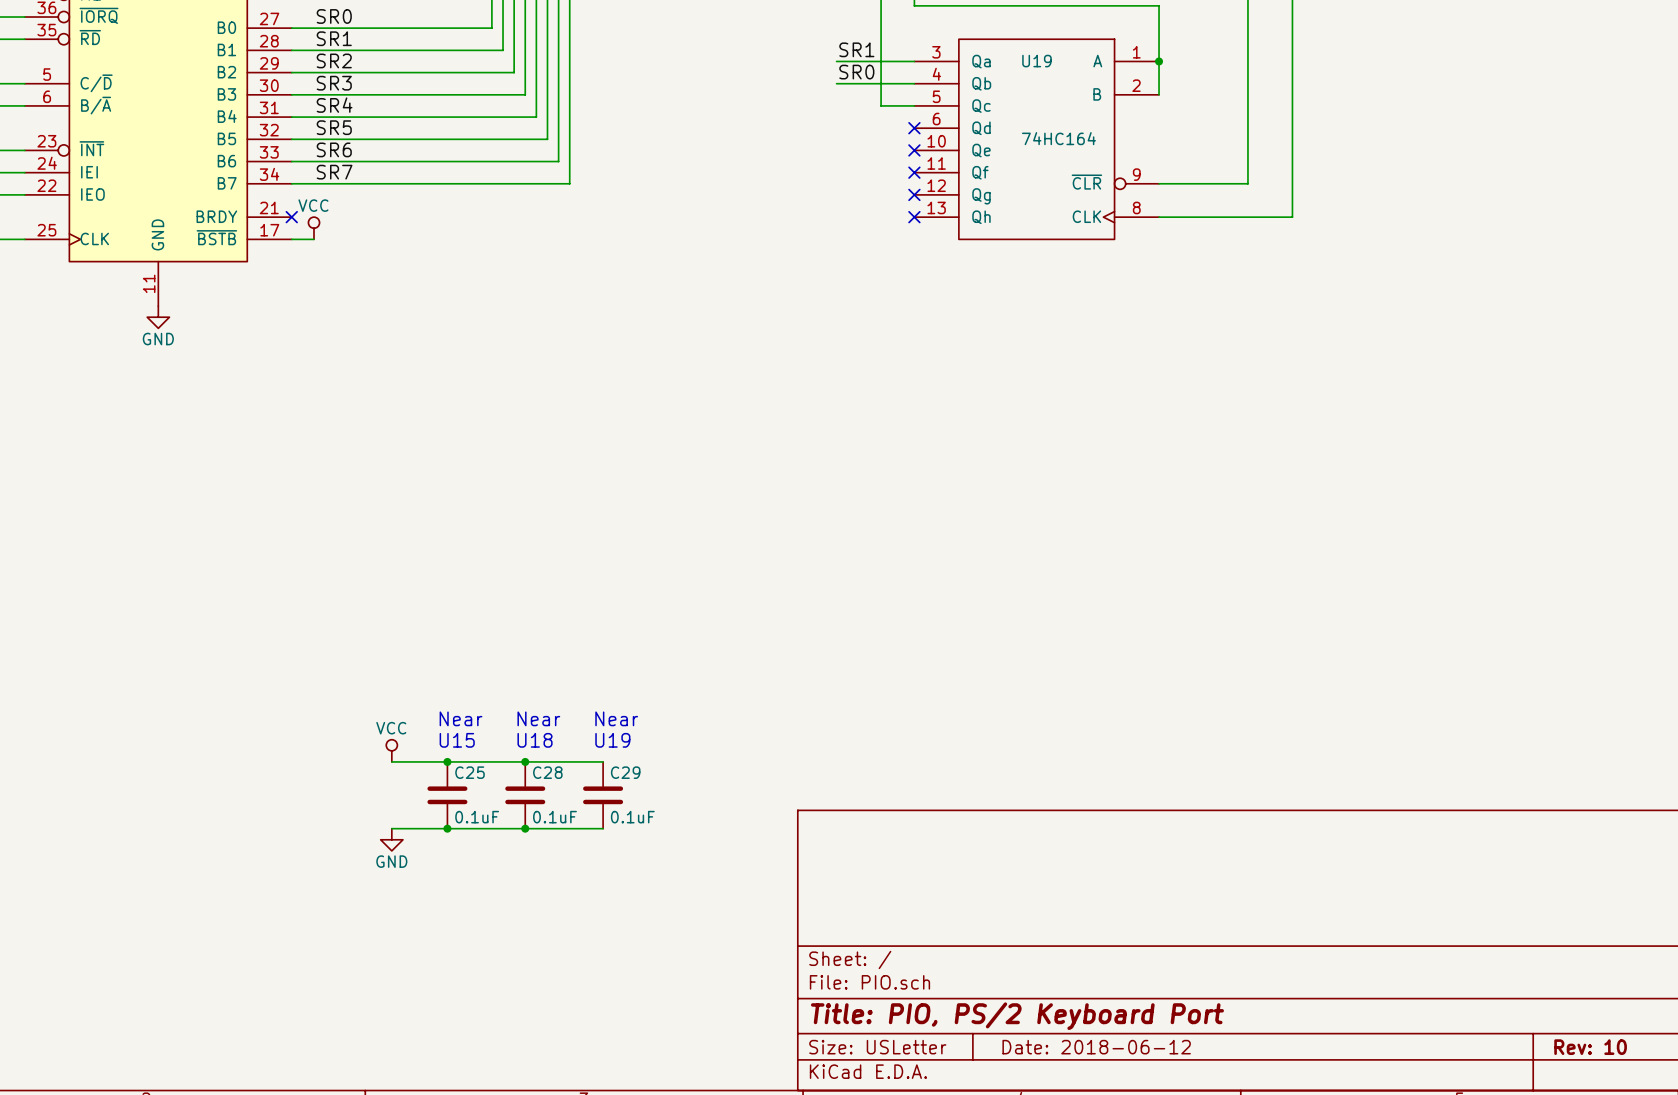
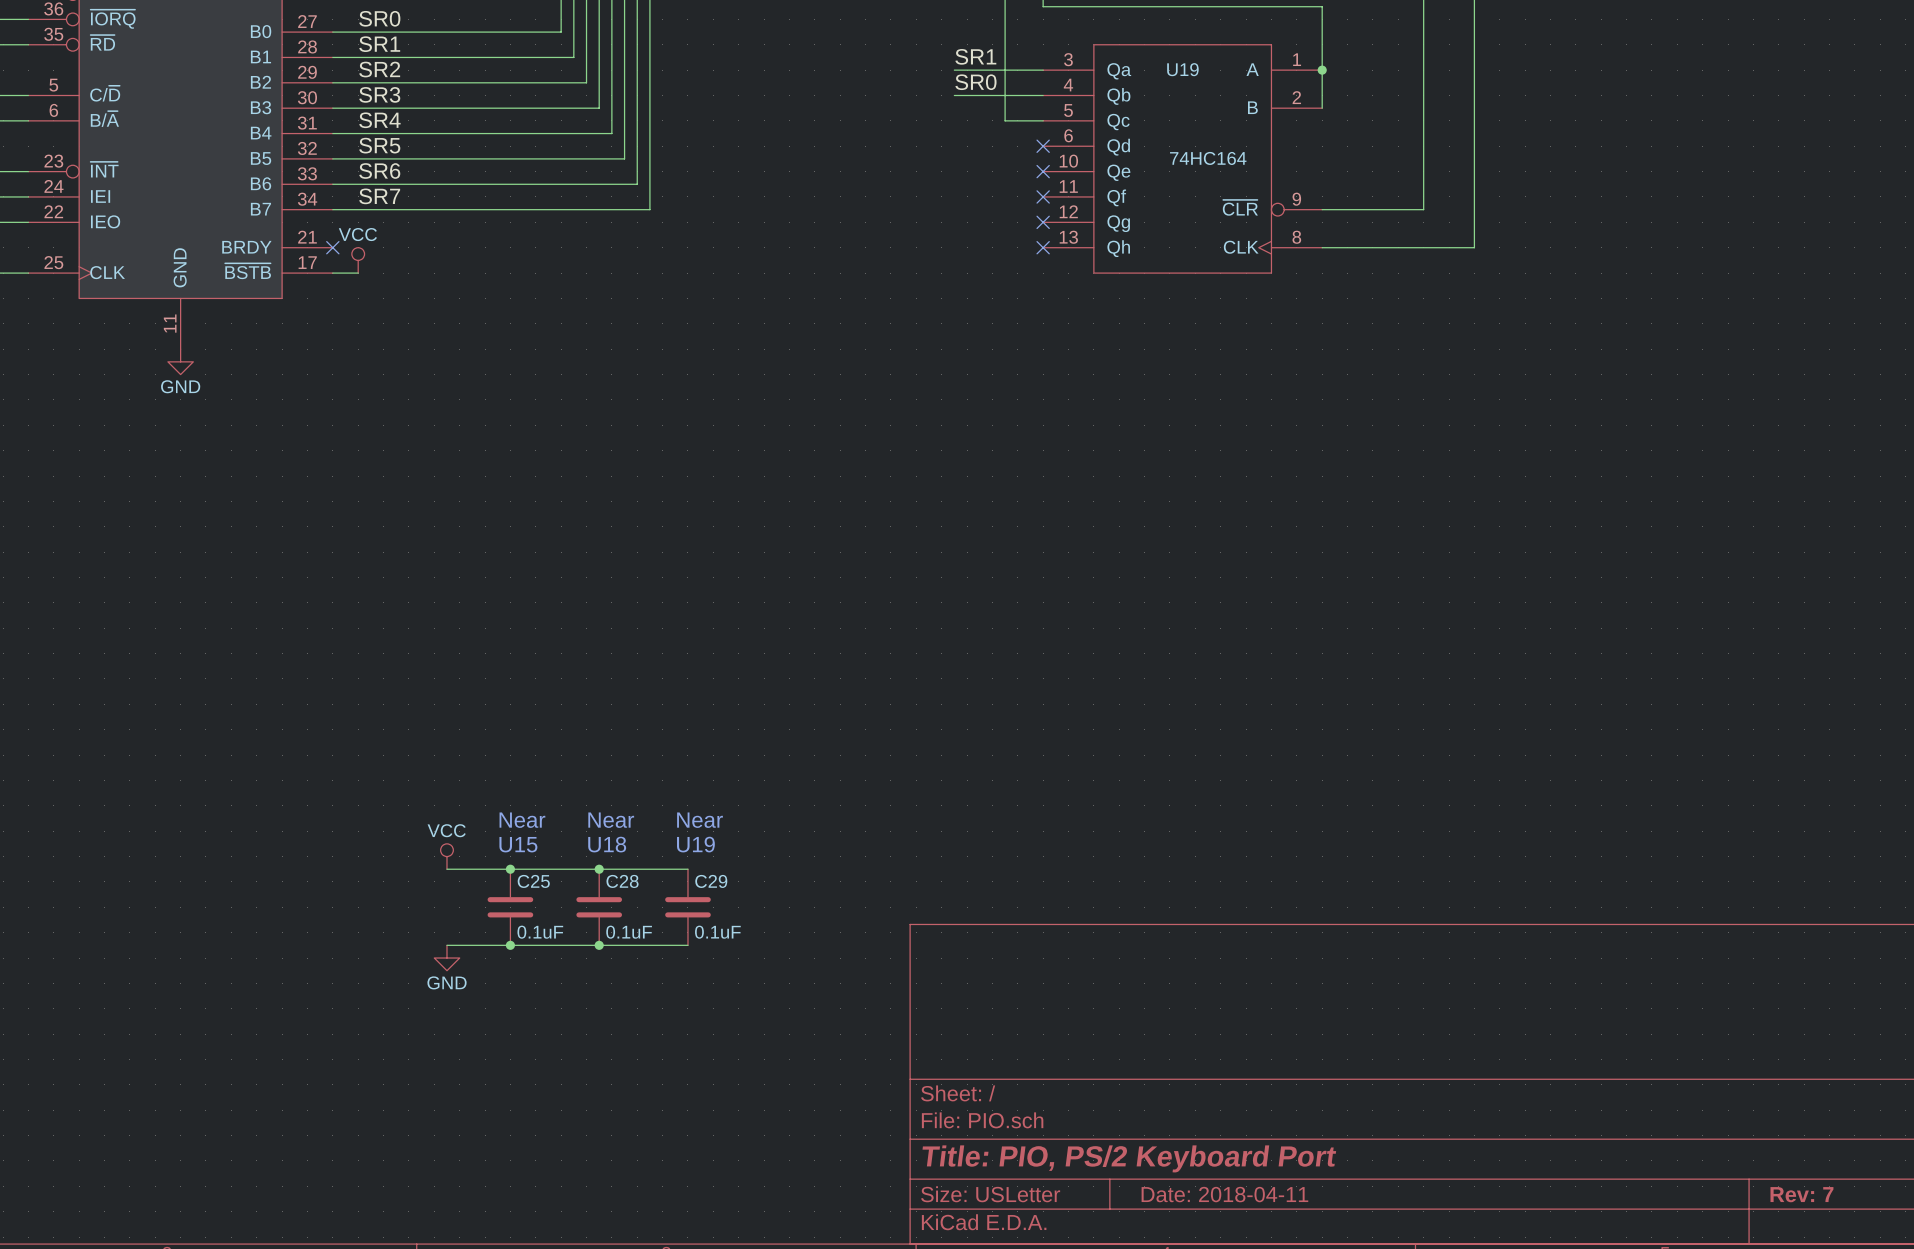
title block: Date: 2018-06-12 (1096, 1047) -> Date: 2018-04-11 (1224, 1194)
title block: Rev: 10 (1590, 1047) -> Rev: 7 (1801, 1194)

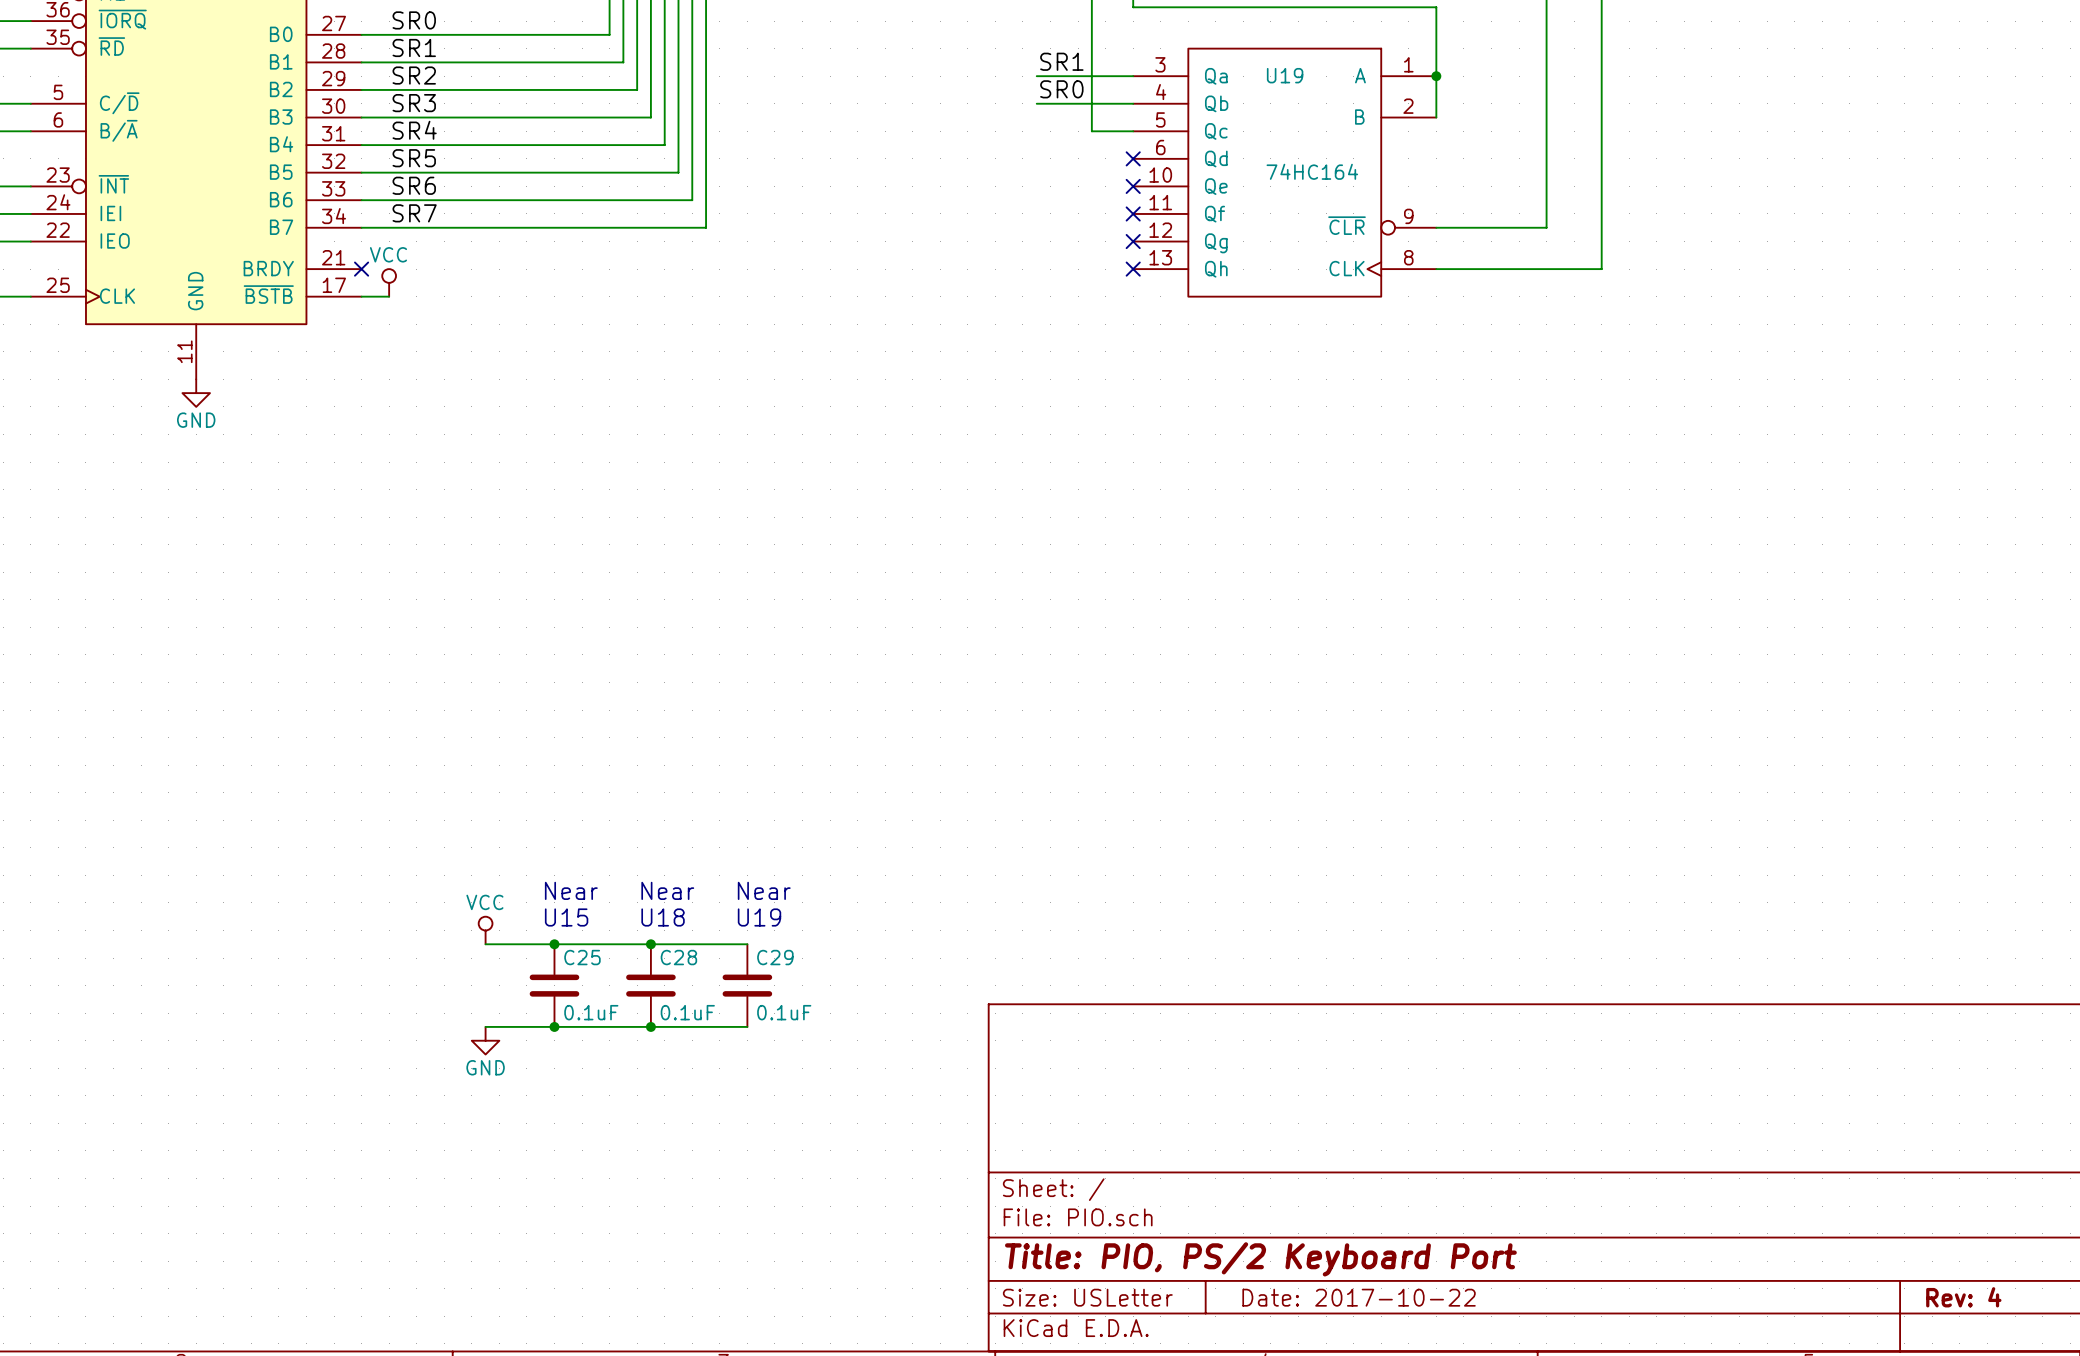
title block: Date: 2018-04-11 (1224, 1194) -> Date: 2017-10-22 (1359, 1297)
title block: Rev: 7 (1801, 1194) -> Rev: 4 (1963, 1297)

